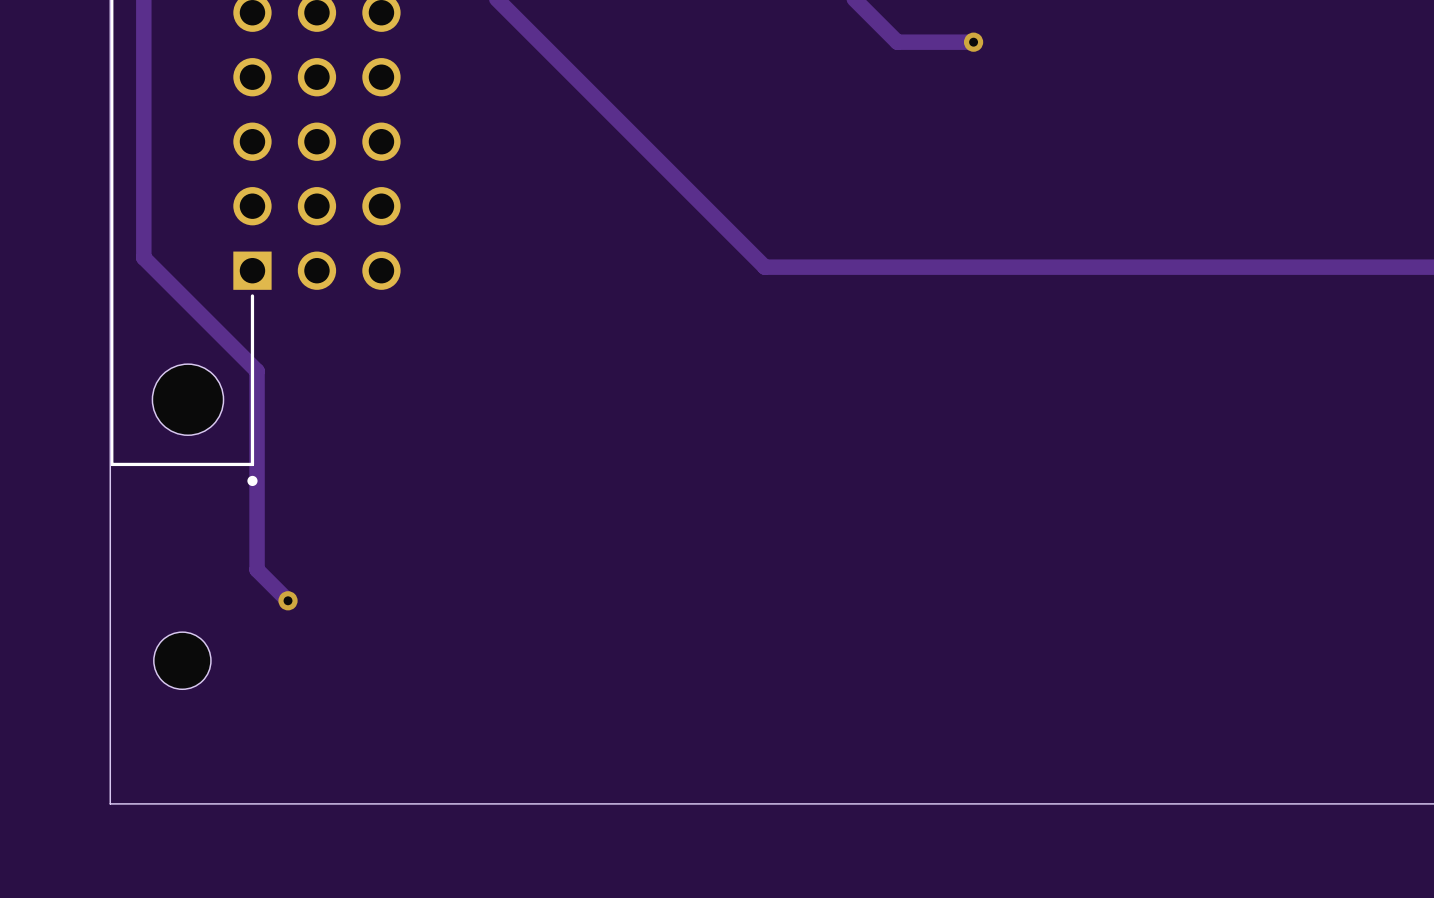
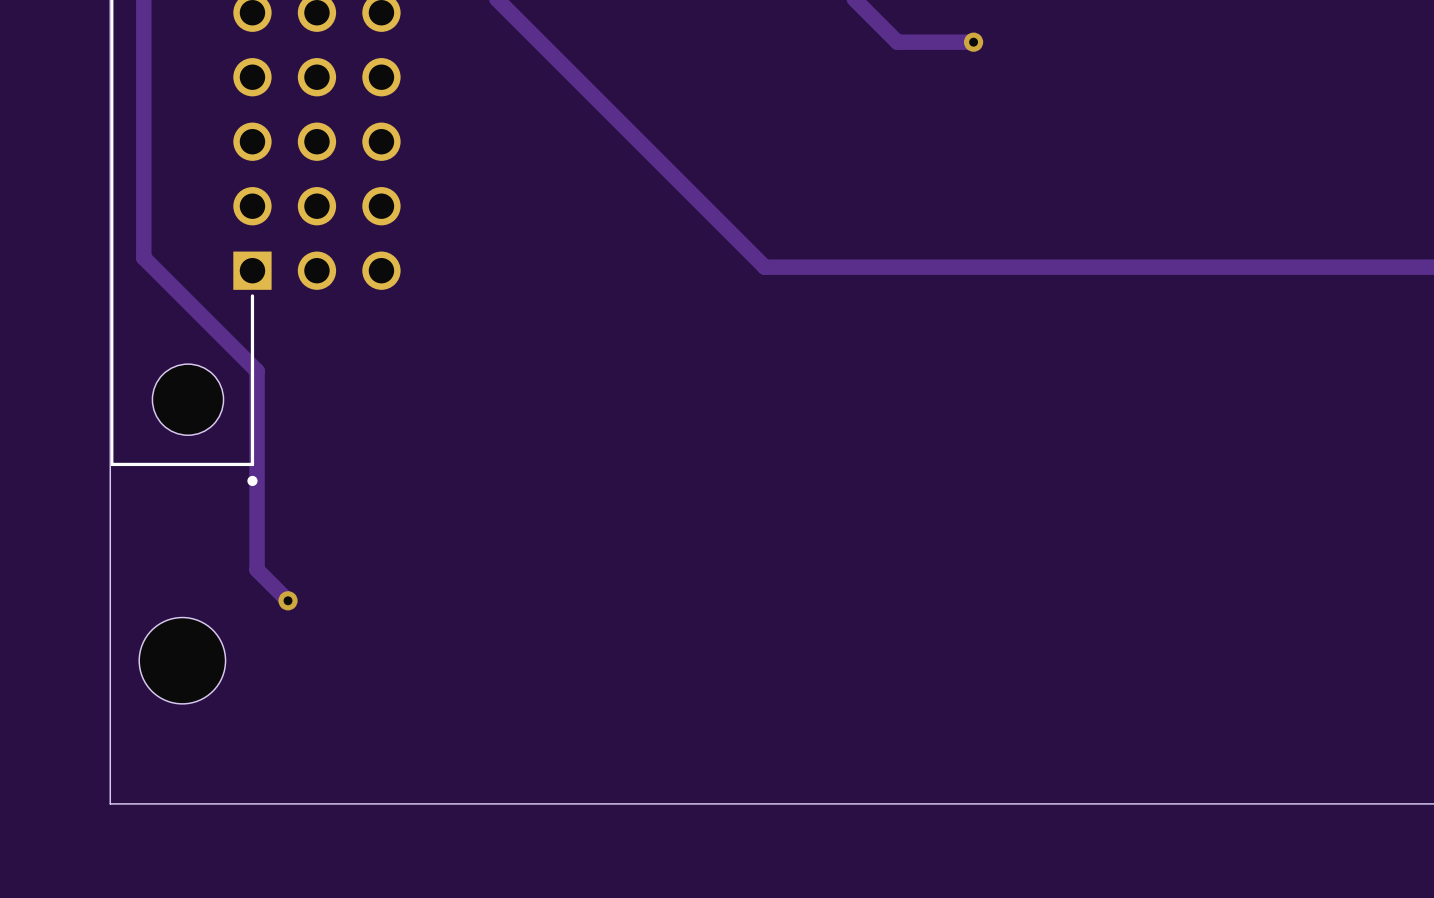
hole size: [153, 632, 211, 690] -> [139, 617, 226, 704]

